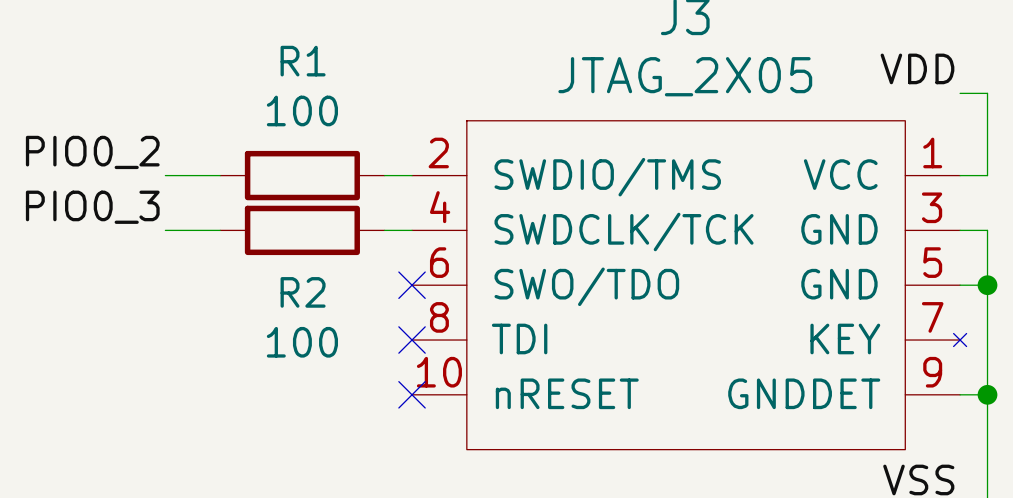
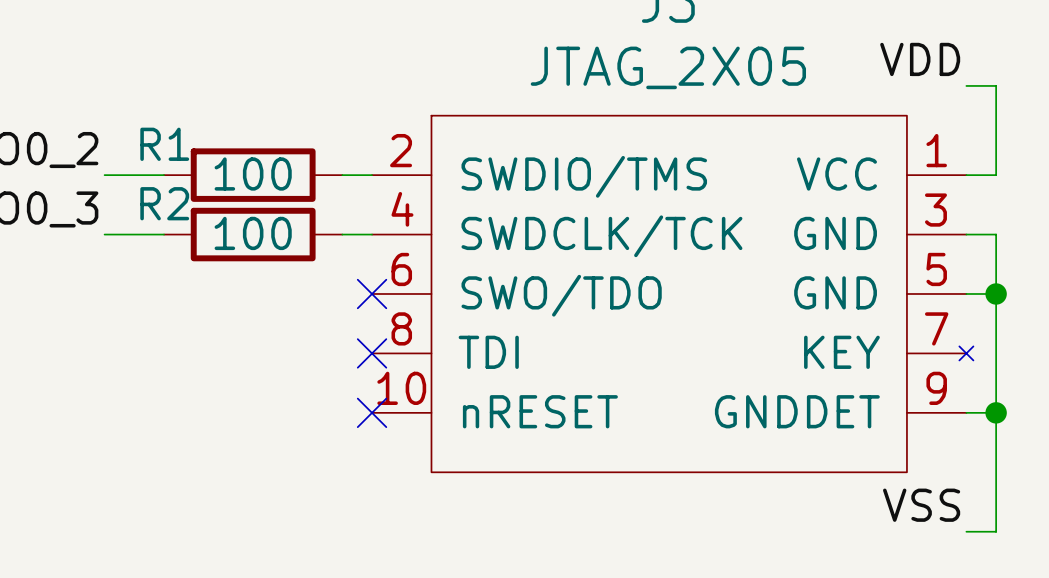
R1 name position: R1 (303, 61) -> R1 (164, 144)
R1 value position: 100 (302, 110) -> 100 (253, 174)
R2 name position: R2 (303, 292) -> R2 (164, 203)
R2 value position: 100 (302, 342) -> 100 (253, 233)

